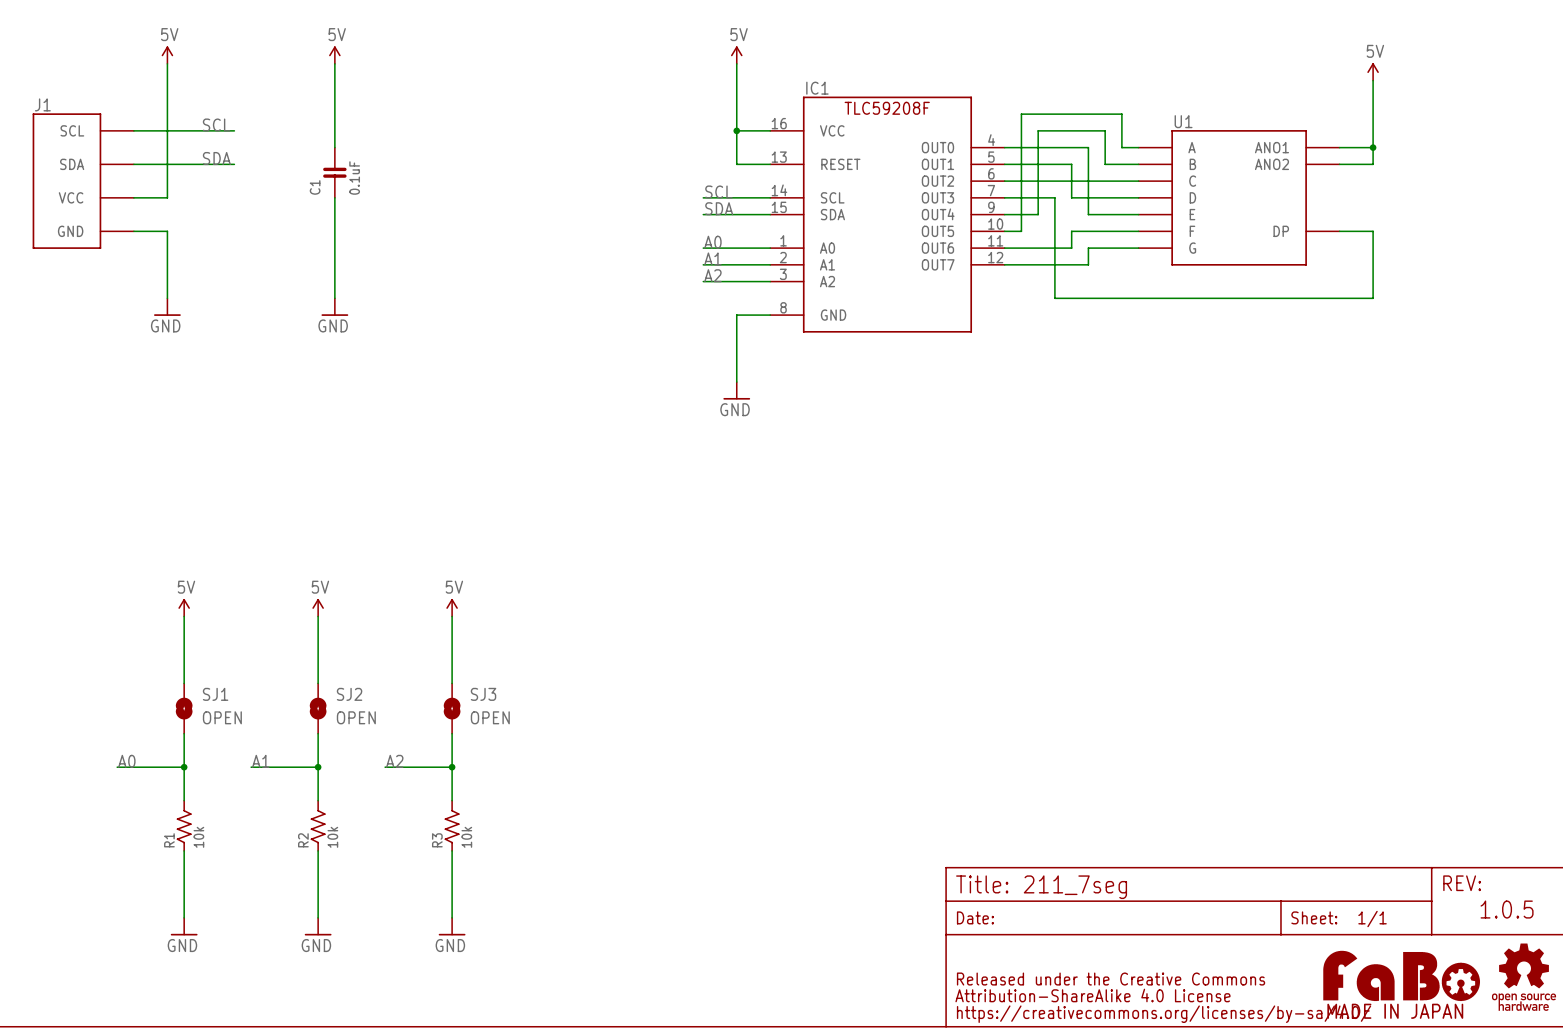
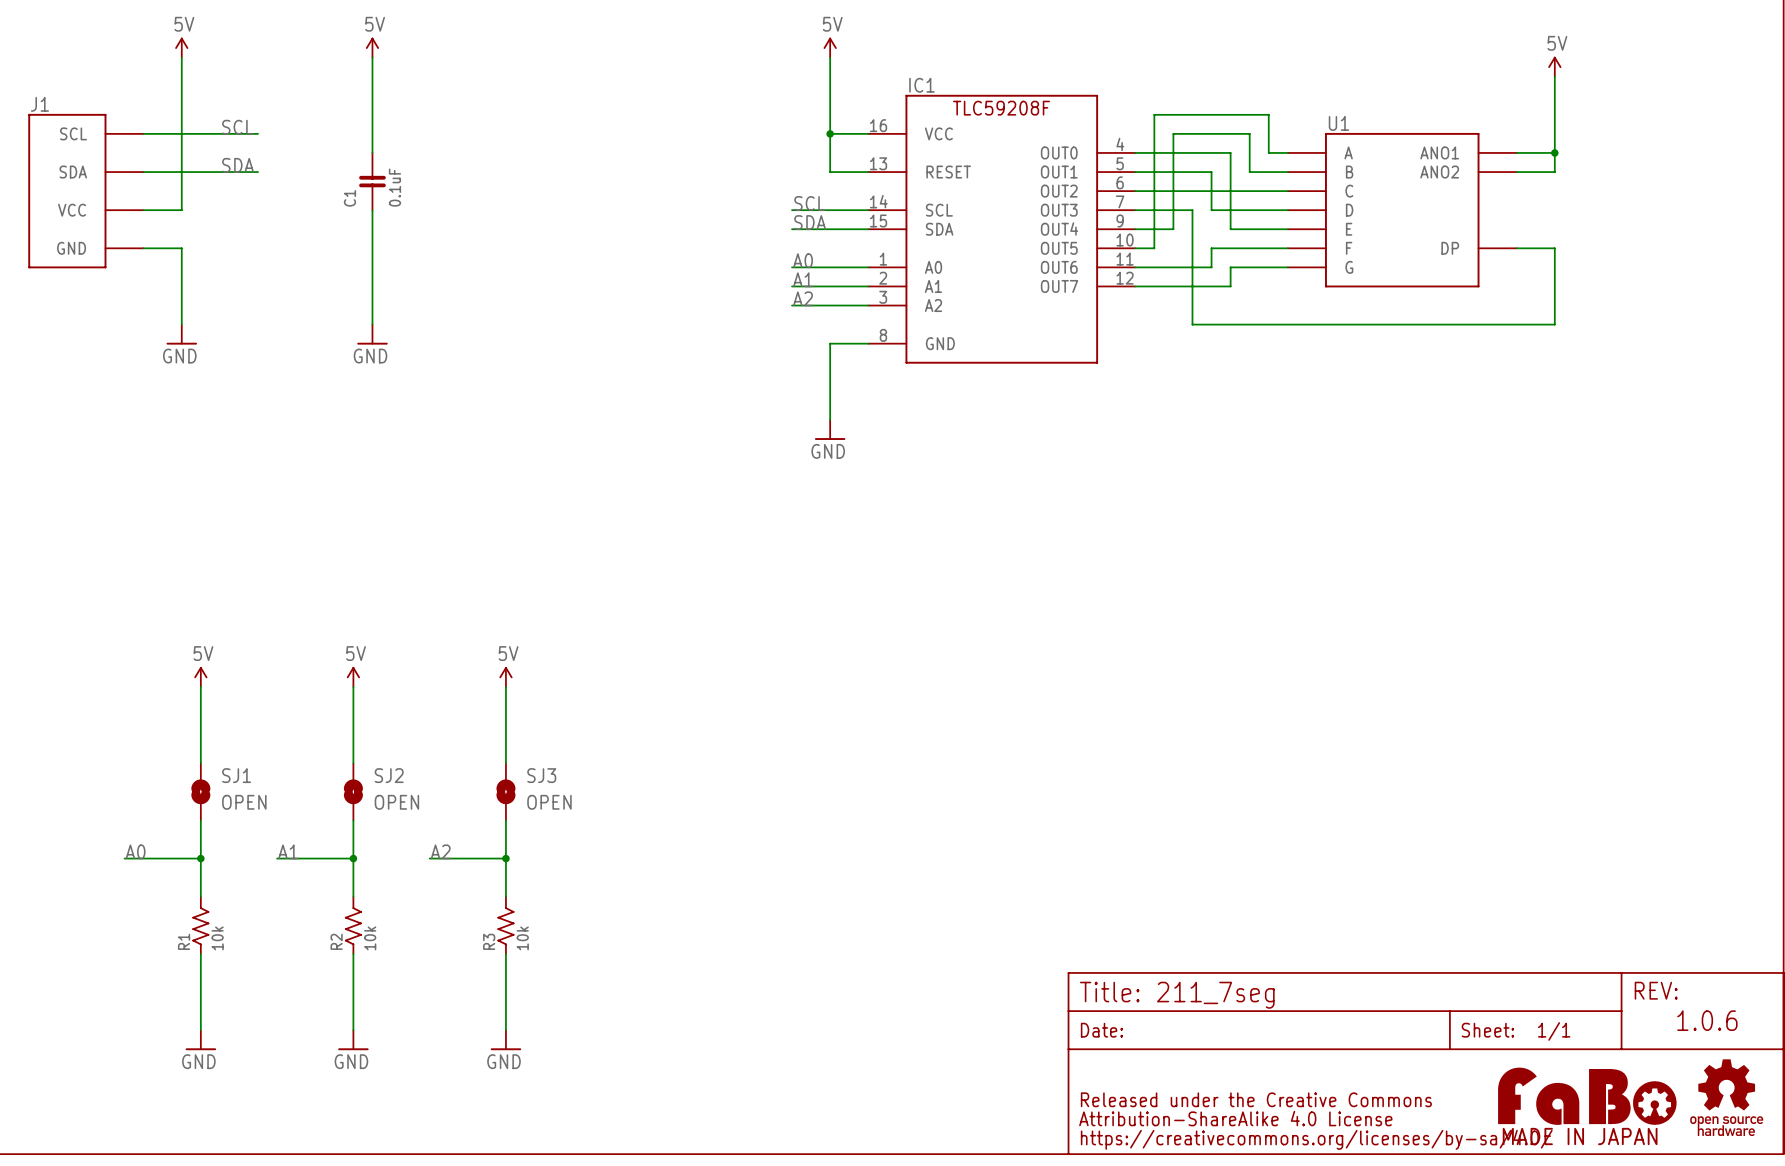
text: 1.0.5 (1507, 909) -> 1.0.6 (1707, 1020)

